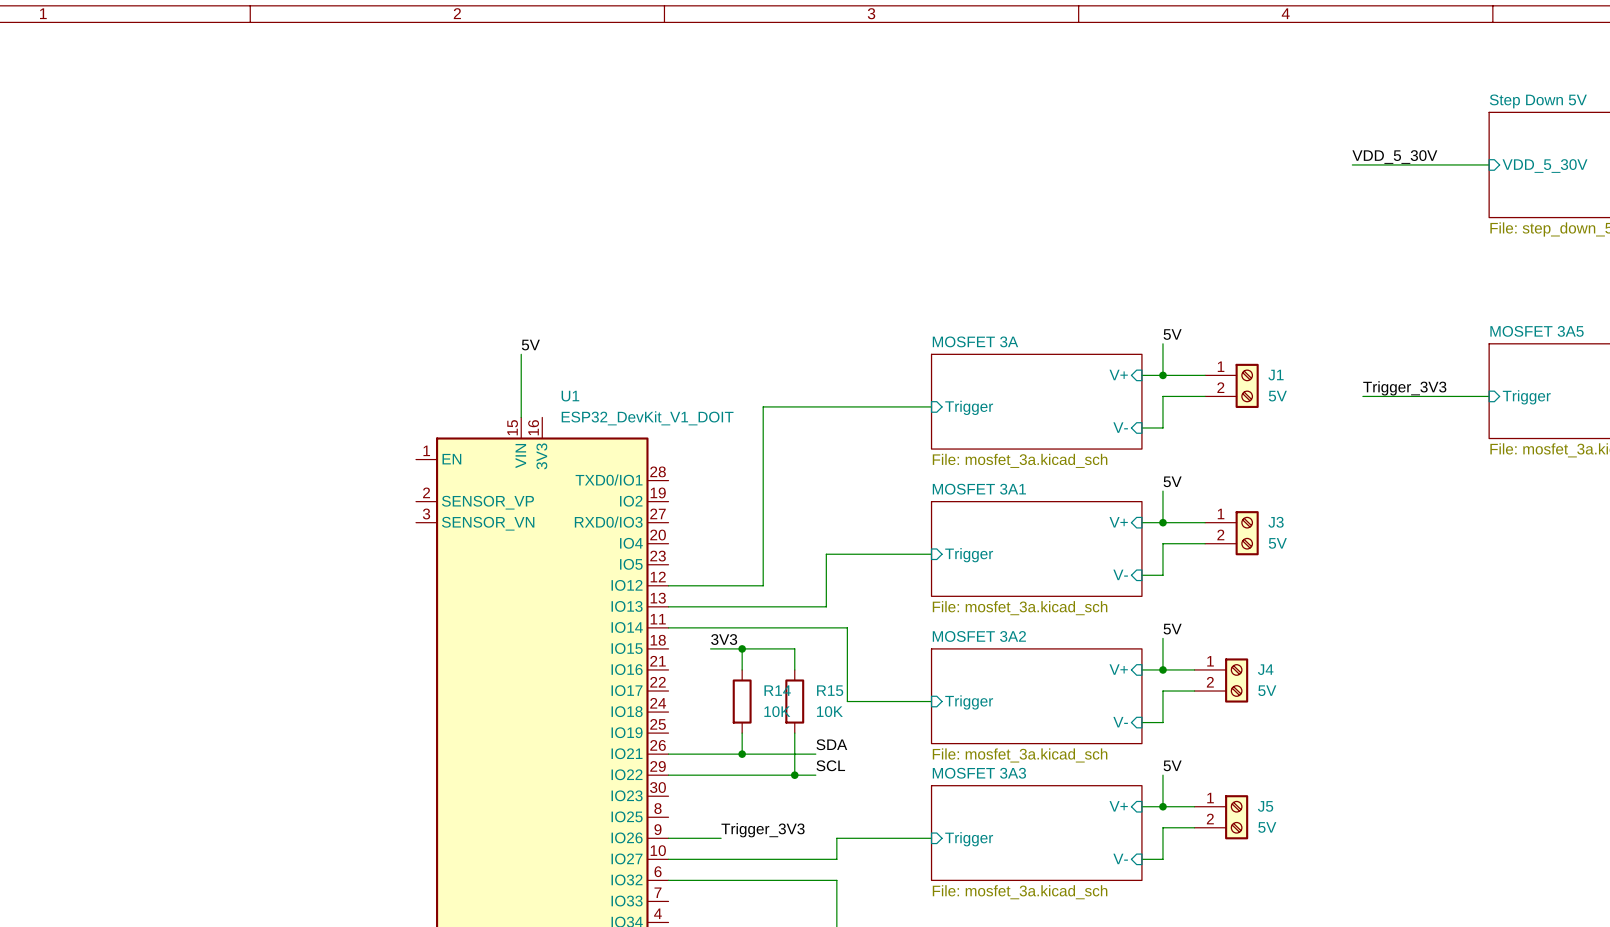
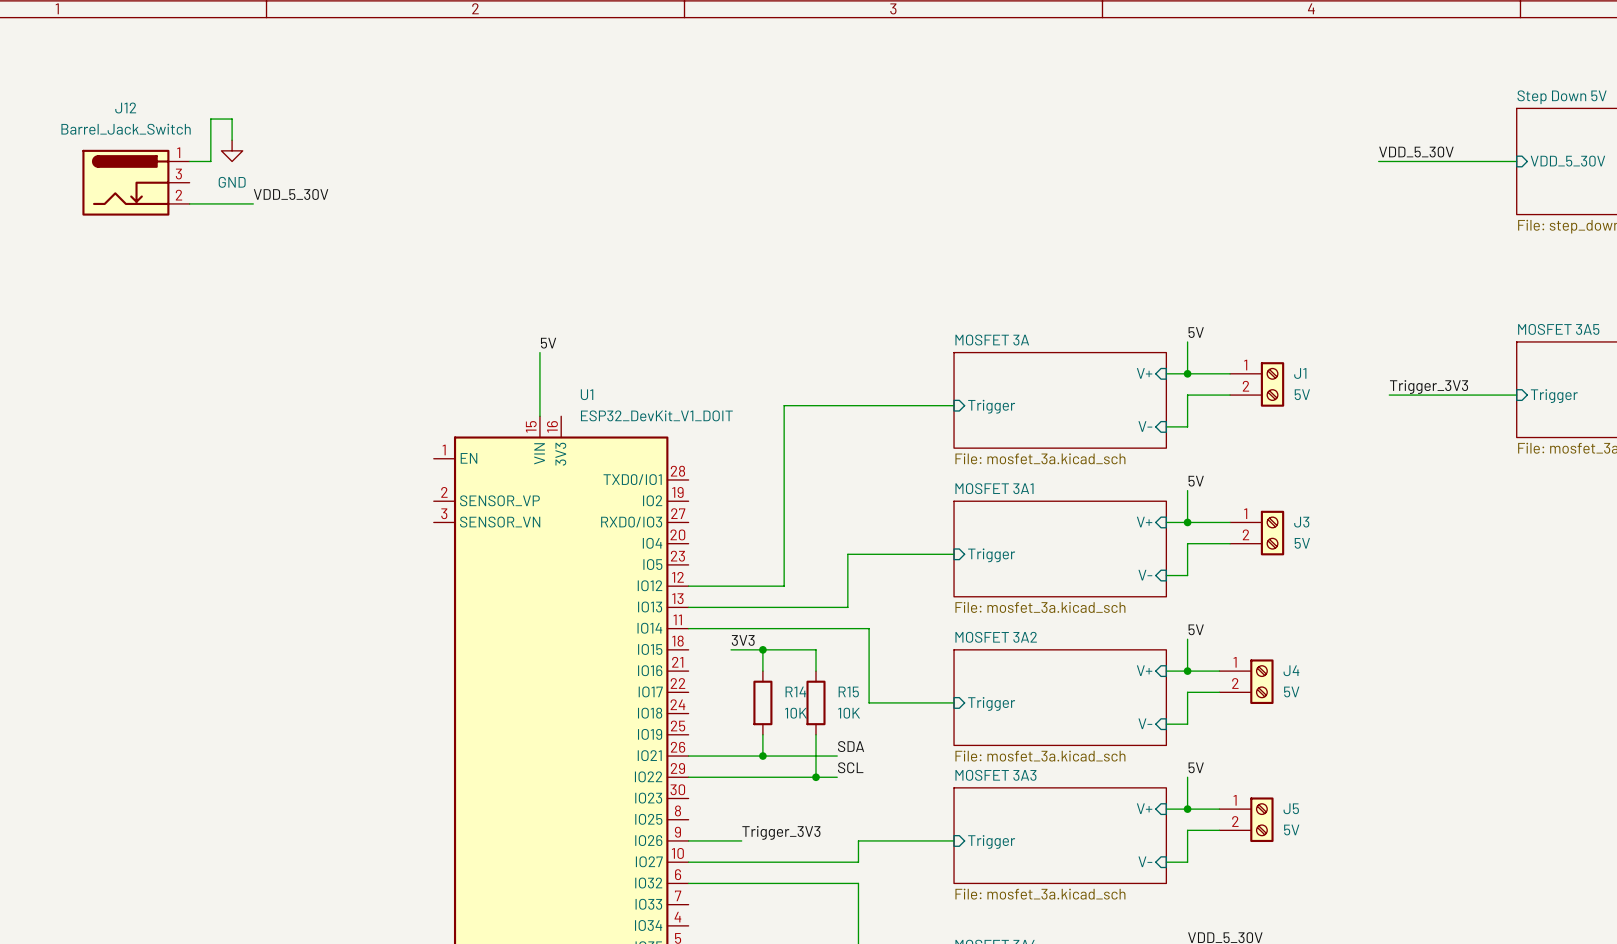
wire: none -> (232, 140) (232, 119) (210, 119) (210, 161) (189, 161)
power symbol: none -> GND (232, 150)
J12: none -> Barrel_Jack_Switch (135, 182)
label: none -> VDD_5_30V (291, 194)
wire: none -> (189, 203) (253, 203)

